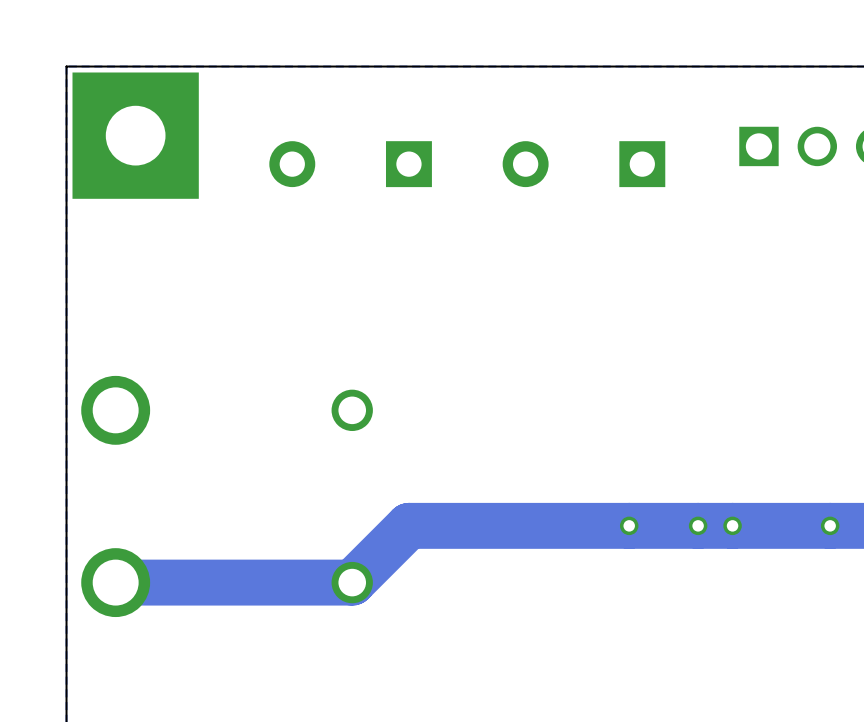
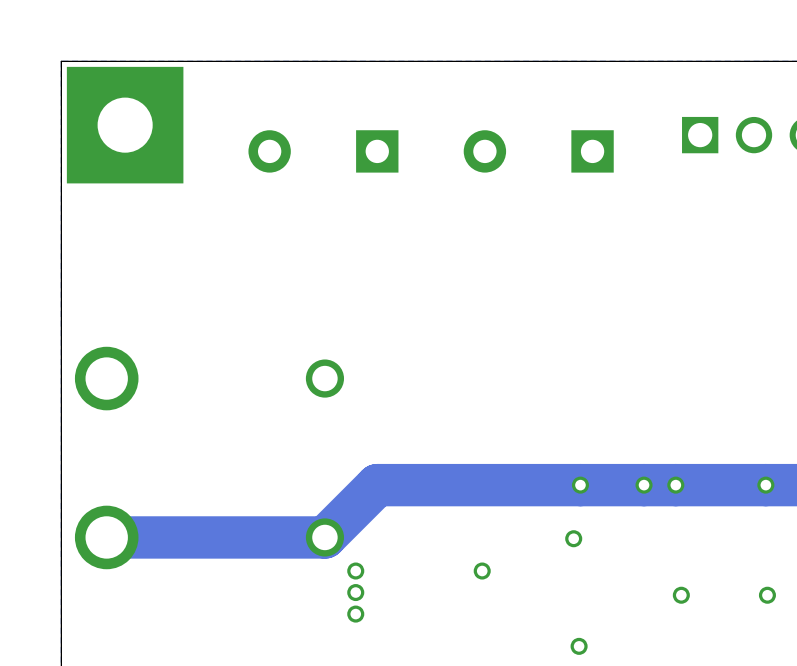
via: none -> (573, 538)
via: none -> (355, 571)
via: none -> (482, 571)
via: none -> (355, 592)
via: none -> (681, 595)
via: none -> (767, 595)
via: none -> (355, 614)
via: none -> (579, 646)

